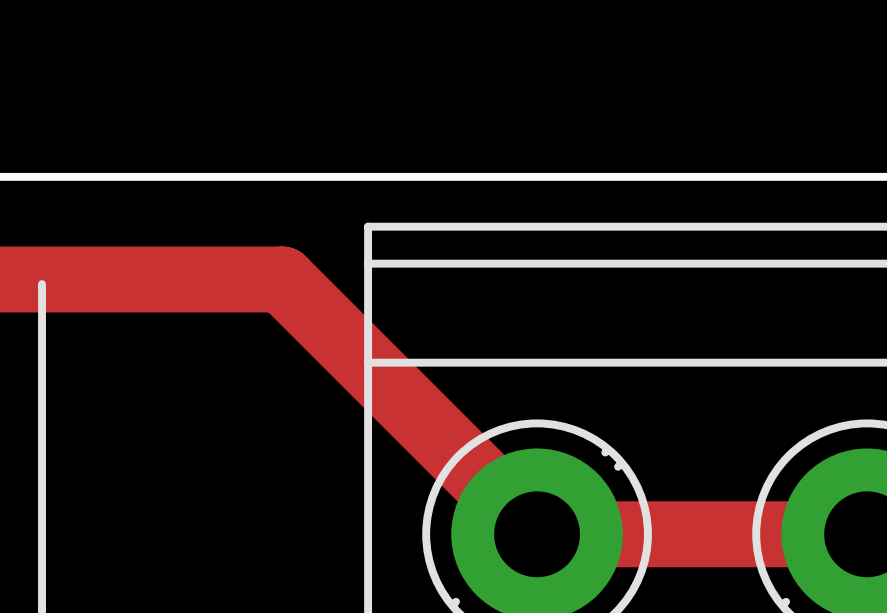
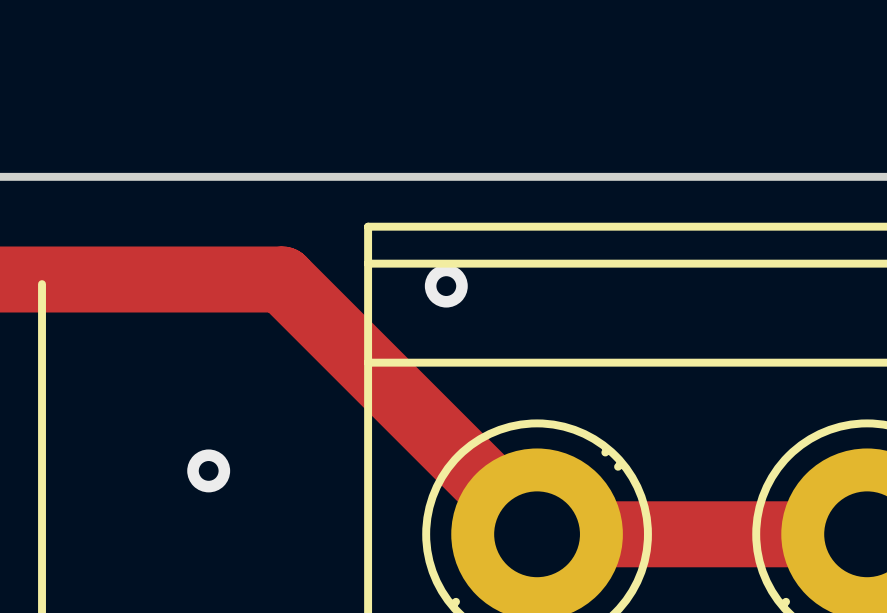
via: none -> (446, 286)
via: none -> (208, 470)

